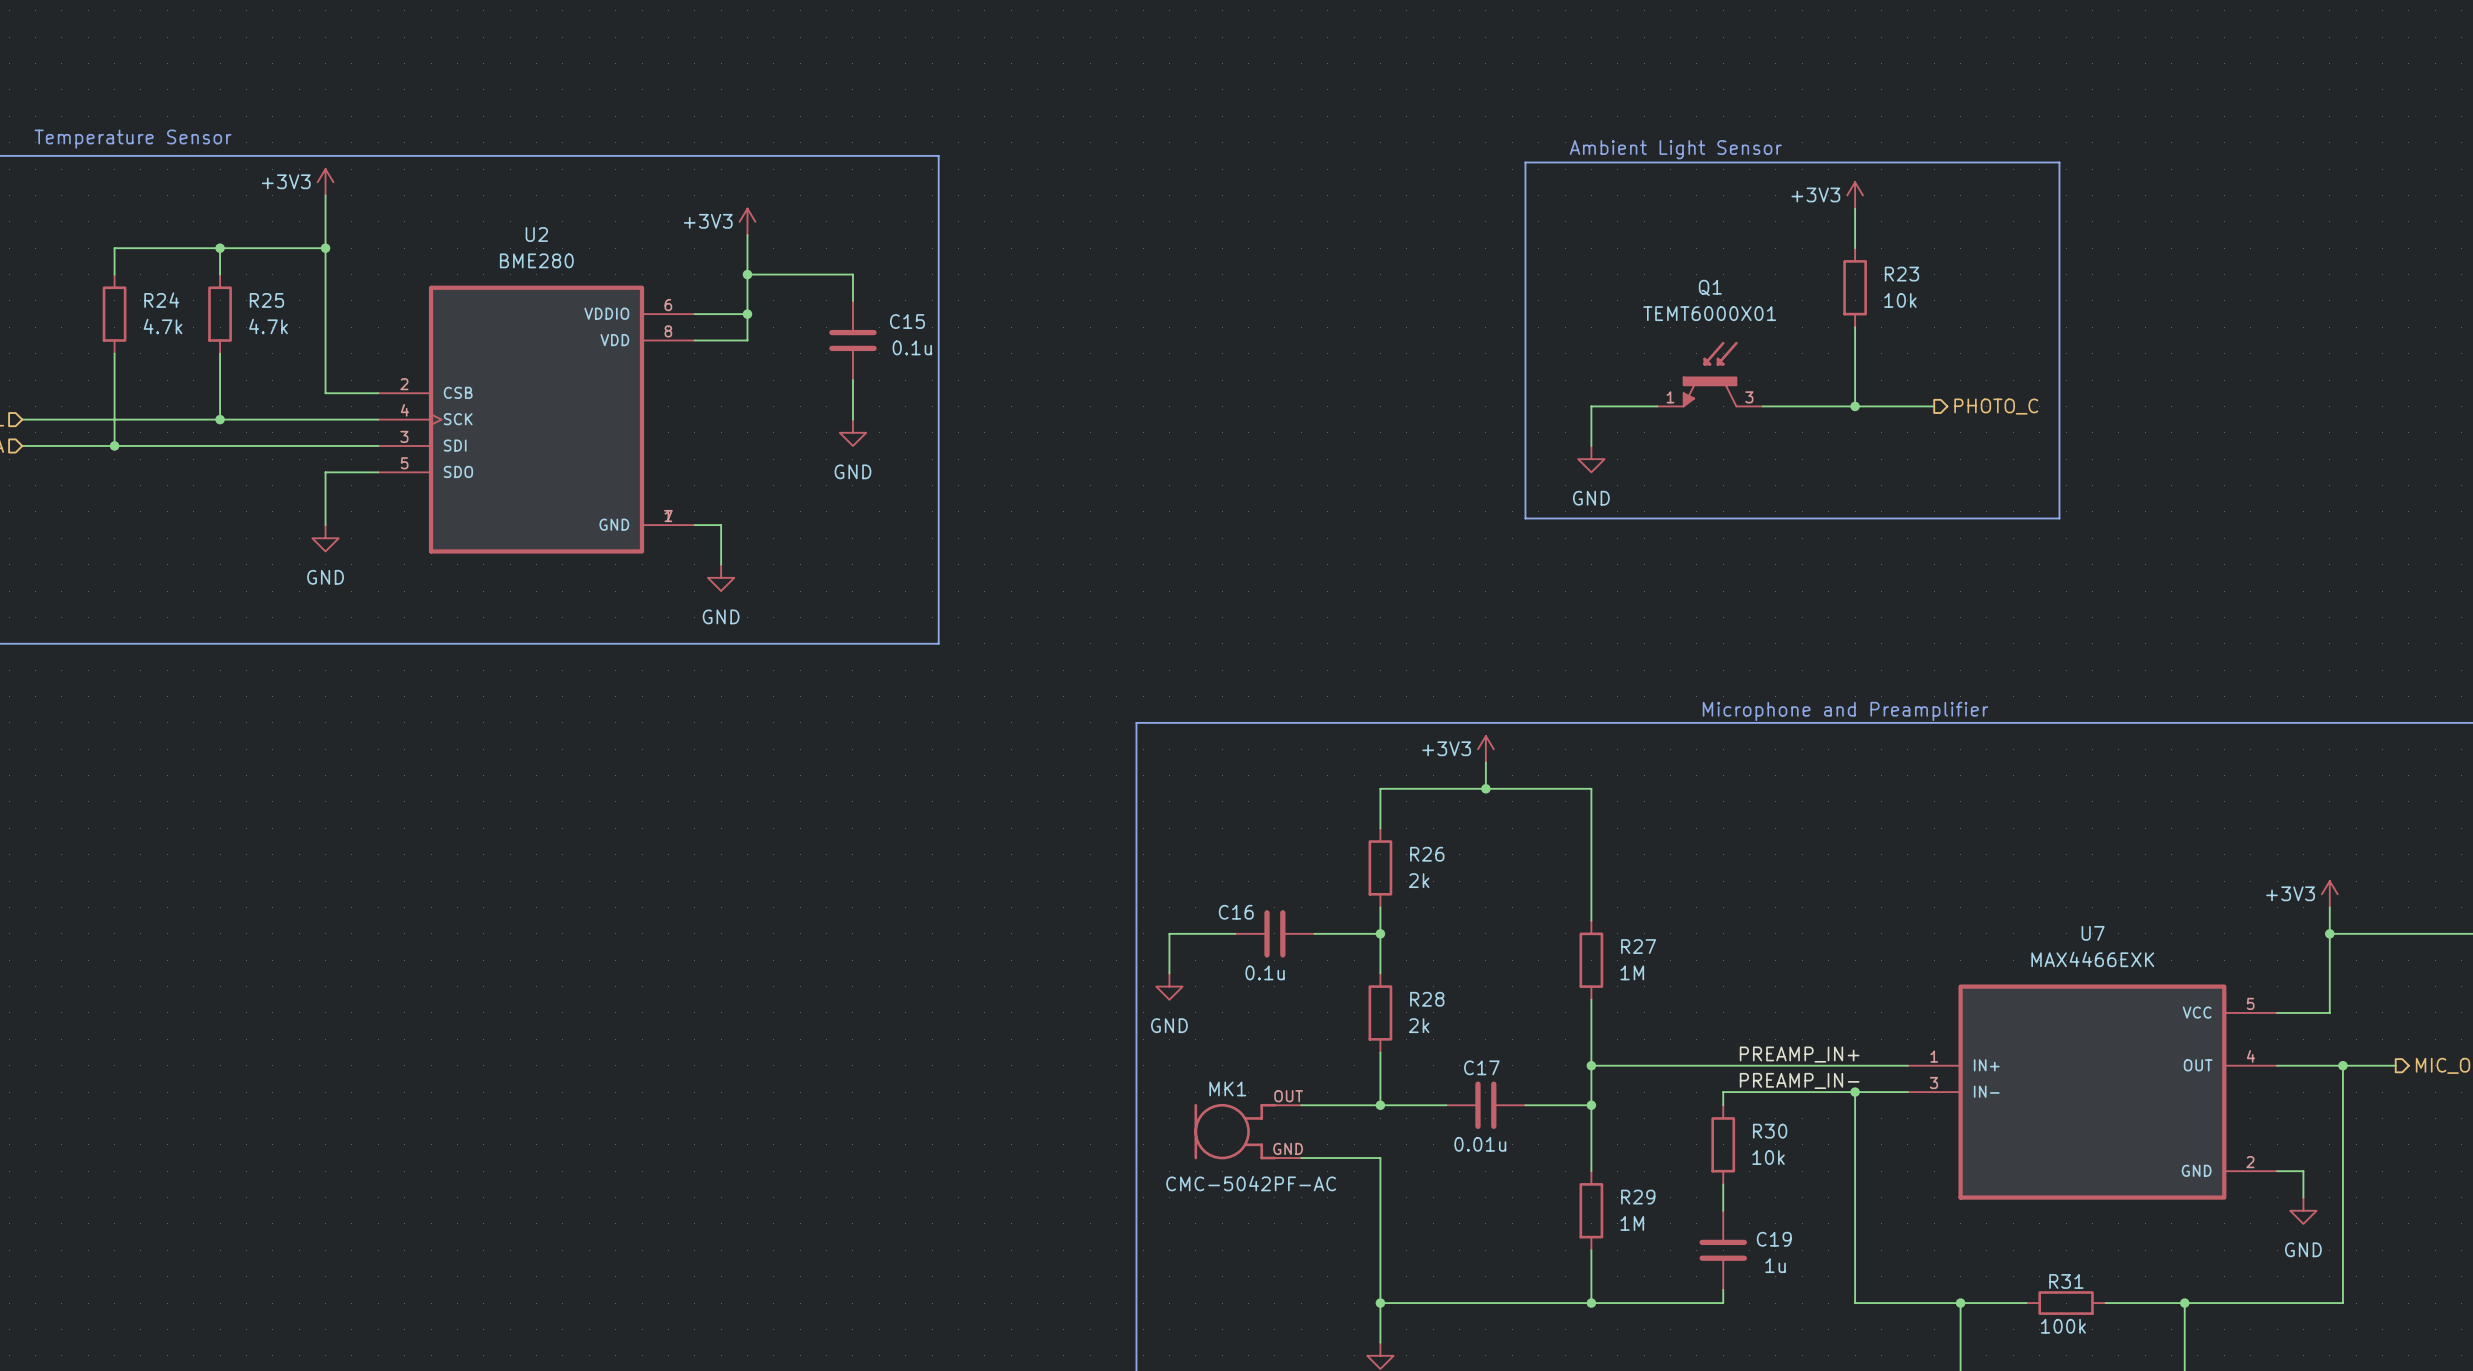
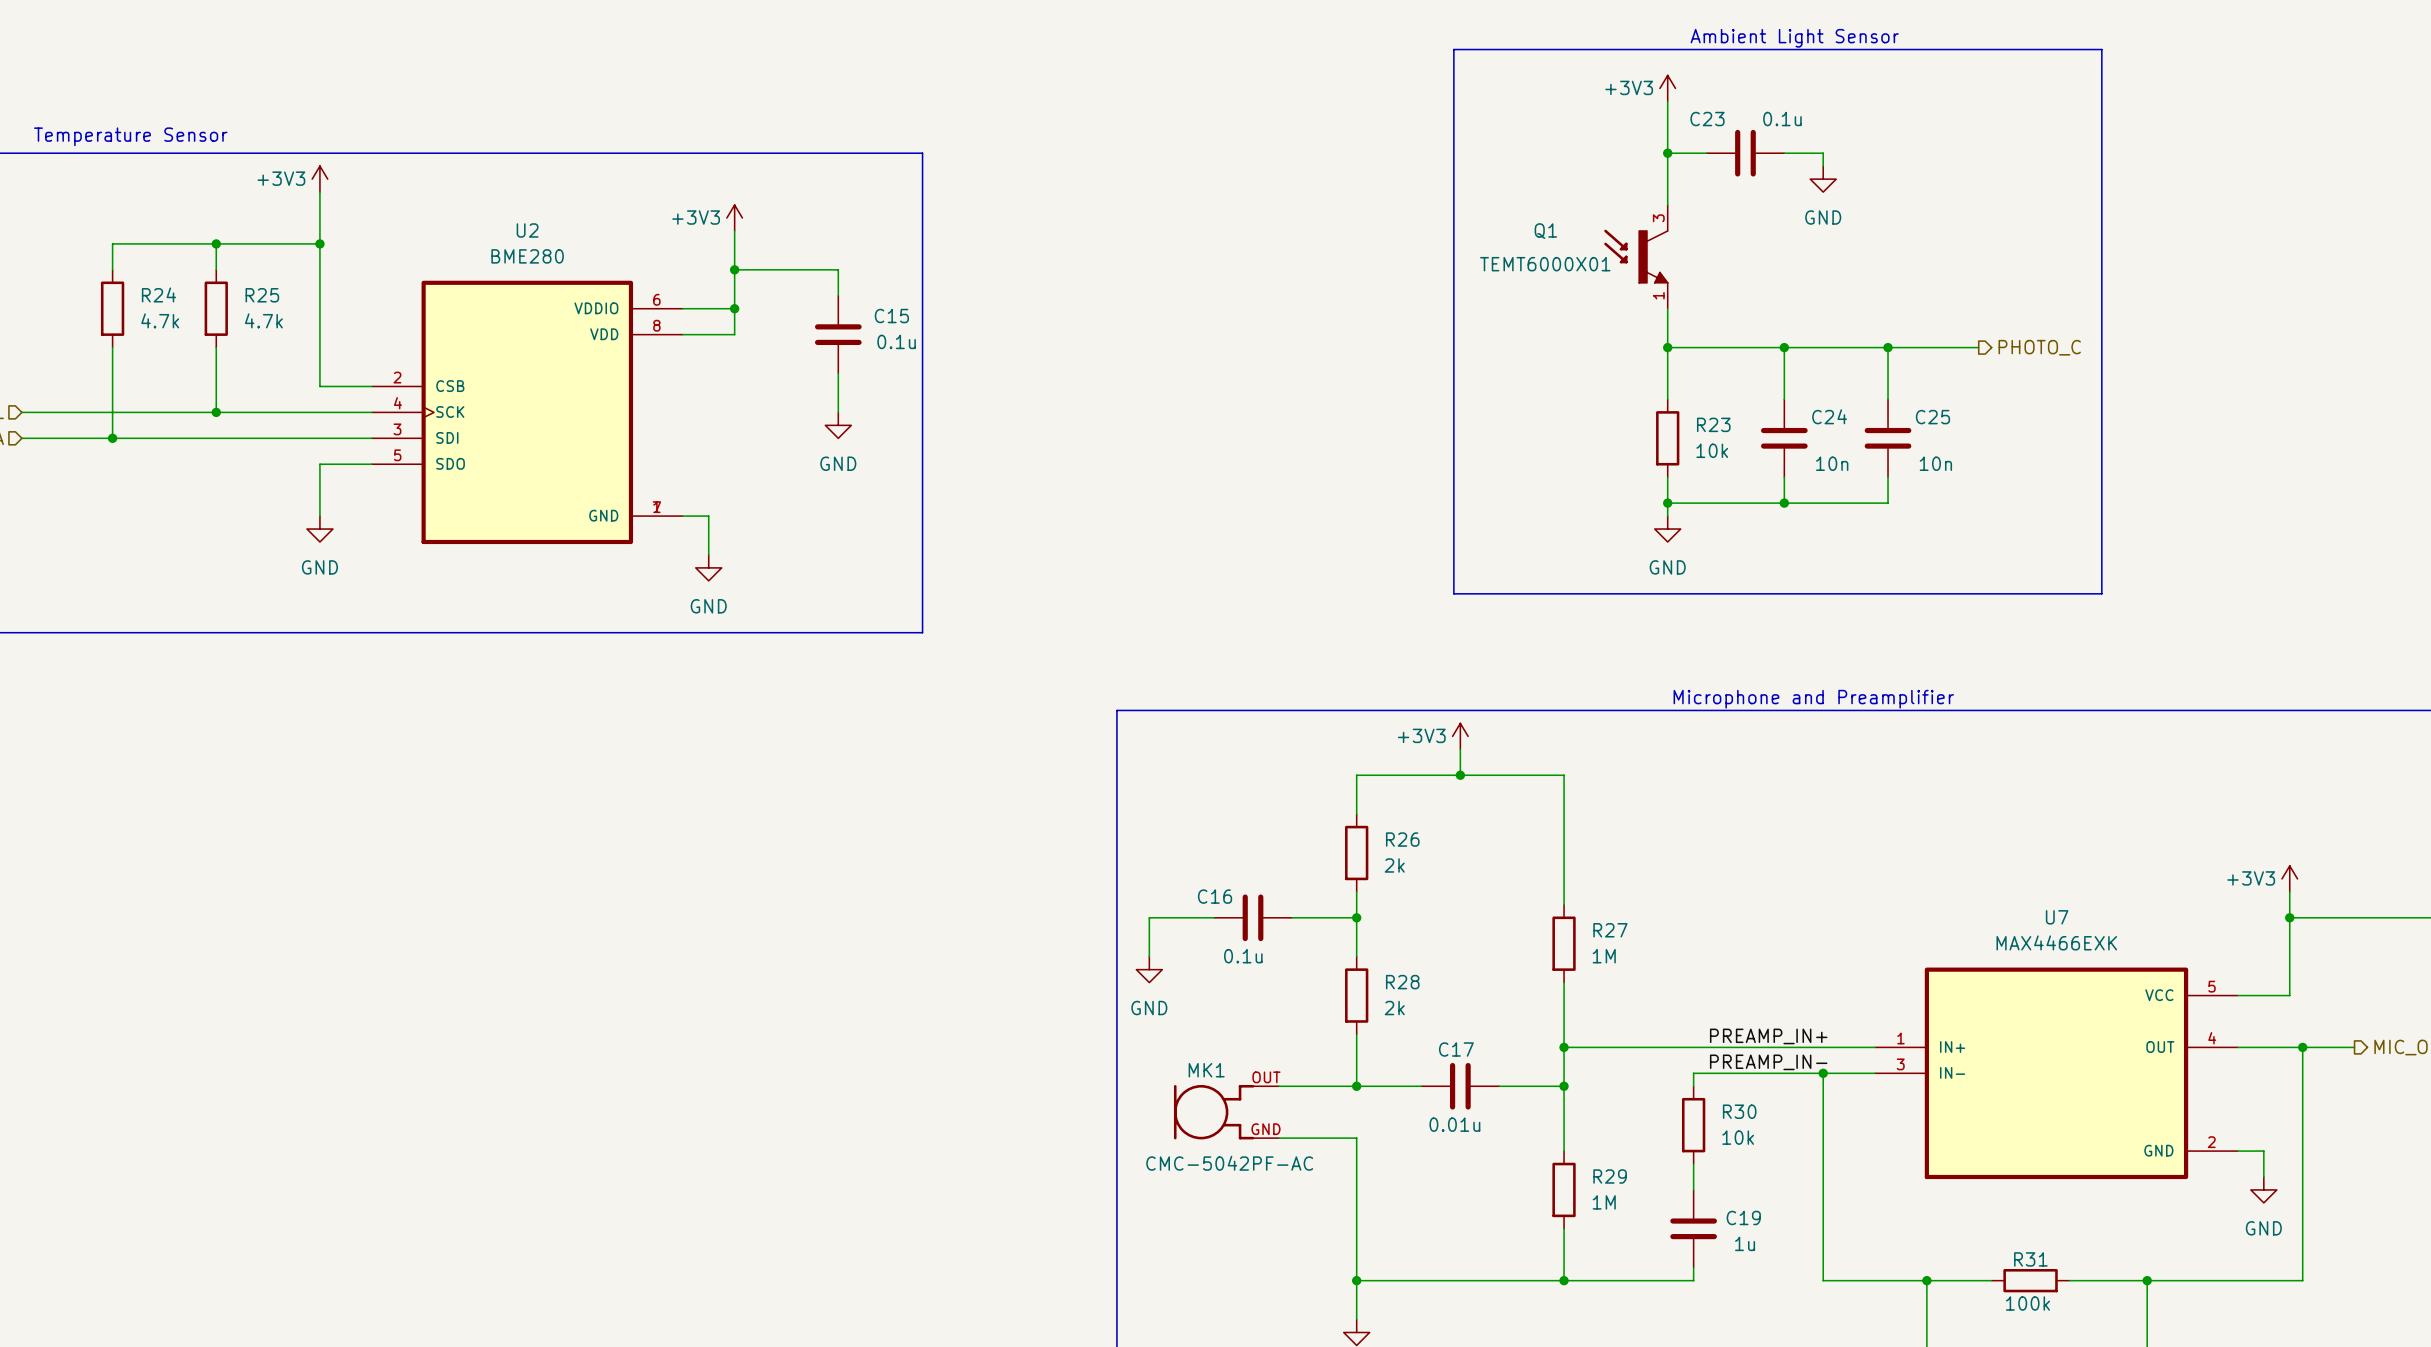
wire: none -> (1667, 101) (1667, 205)
text position: Ambient Light Sensor (1675, 149) -> Ambient Light Sensor (1794, 38)
wire: none -> (1667, 153) (1706, 153)
junction: none -> (1667, 153)
C23: none -> 0.1u (1745, 153)
wire: none -> (1784, 153) (1823, 153) (1823, 166)
line: (1525, 162) (2059, 162) (2059, 518) (1525, 518) (1525, 162) -> (1453, 49) (1453, 593) (2101, 593) (2101, 49) (1453, 49)
power symbol: none -> GND (1823, 179)
power symbol position: +3V3 (1855, 195) -> +3V3 (1667, 88)
wire: (1855, 208) (1855, 248) -> none
Q1 name position: Q1 (1710, 287) -> Q1 (1545, 231)
R23 position: (1855, 287) -> (1667, 438)
Q1 value position: TEMT6000X01 (1709, 313) -> TEMT6000X01 (1545, 264)
wire: none -> (1667, 308) (1667, 399)
wire: (1855, 327) (1855, 406) -> none
wire: none -> (1667, 347) (1978, 347)
junction: none -> (1667, 347)
wire: none -> (1784, 347) (1784, 399)
junction: none -> (1784, 347)
wire: none -> (1888, 347) (1888, 399)
junction: none -> (1888, 347)
Q1 rotation: 0° (1710, 374) -> 90° counterclockwise (1636, 256)
Q1 position: (1710, 374) -> (1636, 256)
wire: (1657, 406) (1591, 406) (1591, 445) -> none
wire: (1762, 406) (1934, 406) -> none
junction: (1855, 406) -> none
hierarchical label position: PHOTO_C (1996, 406) -> PHOTO_C (2039, 347)
C24: none -> 10n (1784, 438)
C25: none -> 10n (1888, 438)
power symbol position: GND (1591, 459) -> GND (1667, 529)
wire: none -> (1667, 477) (1667, 516)
wire: none -> (1784, 477) (1784, 503)
wire: none -> (1888, 477) (1888, 503) (1667, 503)
junction: none -> (1667, 503)
junction: none -> (1784, 503)

